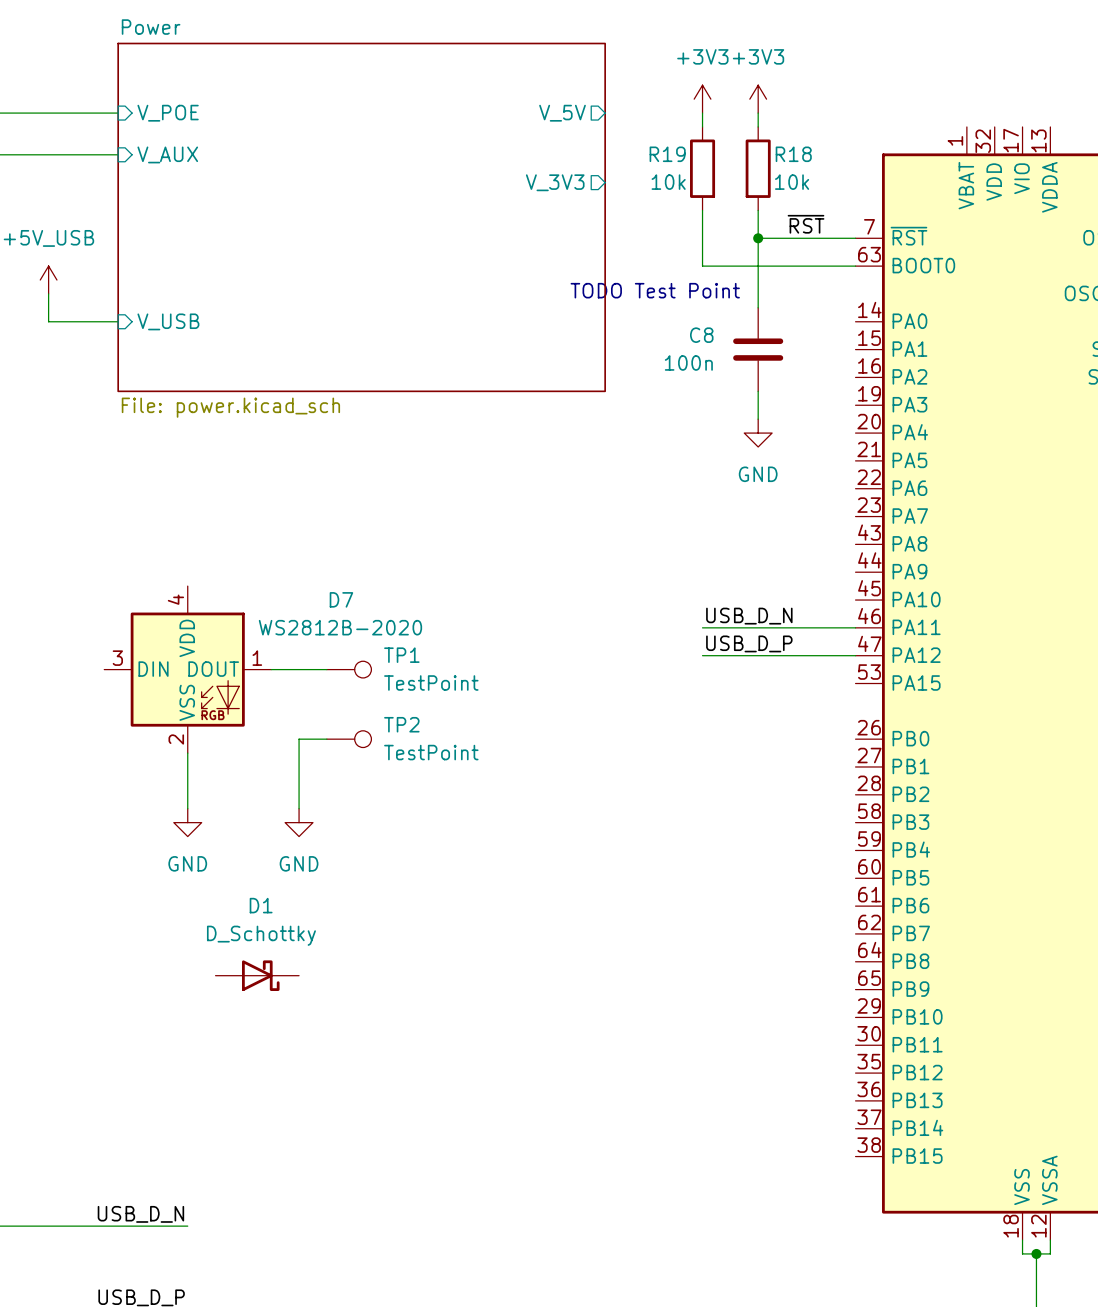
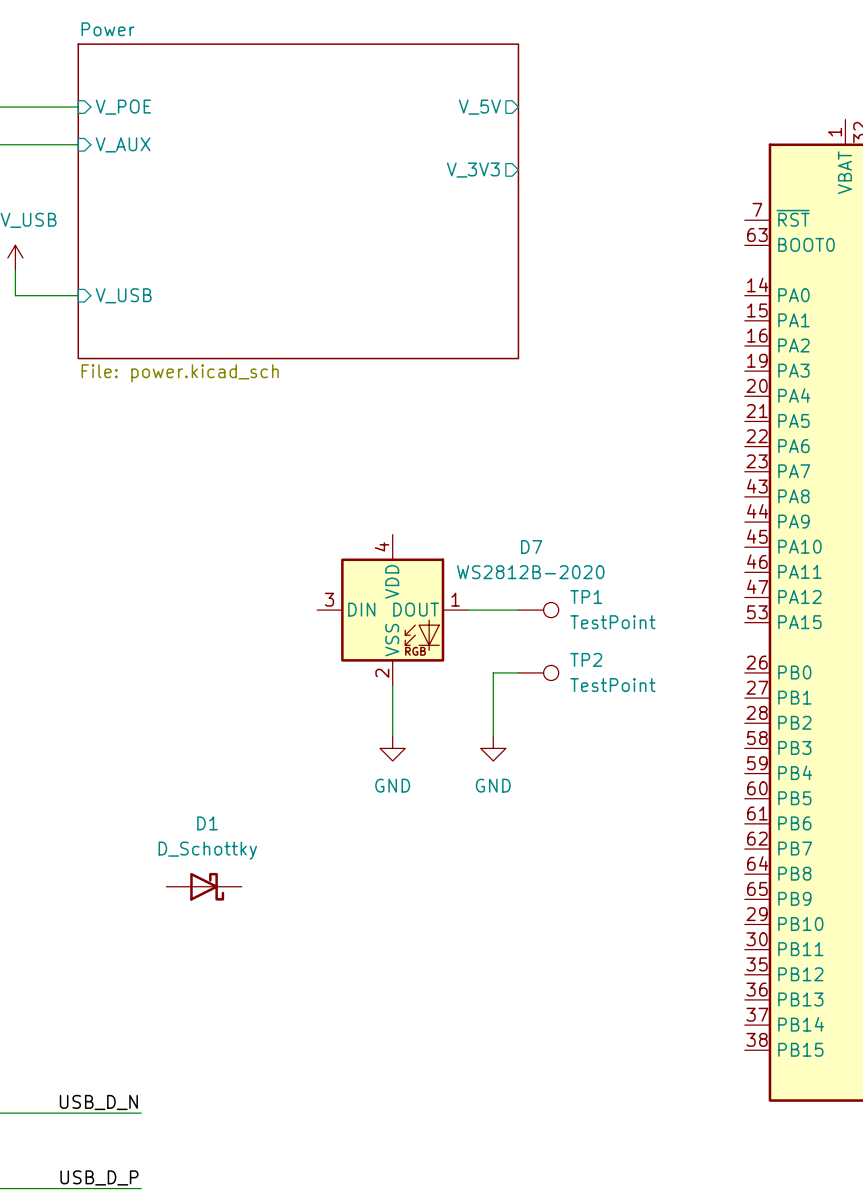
power symbol: +3V3 (702, 99) -> none
power symbol: +3V3 (758, 99) -> none
wire: (702, 113) (702, 126) -> none
wire: (758, 113) (758, 126) -> none
R19: 10k (702, 168) -> none
R18: 10k (758, 168) -> none
wire: (702, 210) (702, 266) (855, 266) -> none
wire: (758, 210) (758, 307) -> none
label: ~{RST} (806, 224) -> none
wire: (758, 238) (855, 238) -> none
junction: (758, 238) -> none
text: TODO Test Point (655, 290) -> none
C8: 100n (758, 349) -> none
wire: (758, 391) (758, 419) -> none
power symbol: GND (758, 433) -> none
label: USB_D_N (749, 616) -> none
wire: (702, 627) (855, 627) -> none
label: USB_D_P (749, 643) -> none
wire: (702, 655) (855, 655) -> none
D7 position: (187, 669) -> (392, 610)
wire: (271, 669) (326, 669) -> none
TP1 position: (349, 669) -> (538, 610)
wire: none -> (468, 610) (518, 610)
wire: (326, 739) (299, 739) (299, 808) -> none
TP2 position: (349, 739) -> (538, 672)
wire: none -> (518, 672) (493, 672) (493, 735)
wire: (187, 753) (187, 808) -> none
wire: none -> (392, 685) (392, 735)
power symbol: GND (187, 822) -> none
power symbol: GND (299, 822) -> none
power symbol: none -> GND (392, 748)
power symbol: none -> GND (493, 748)

